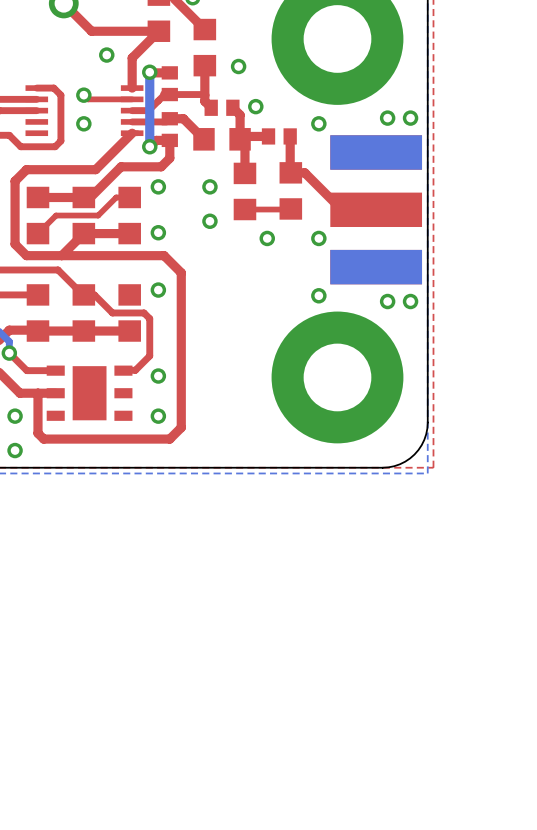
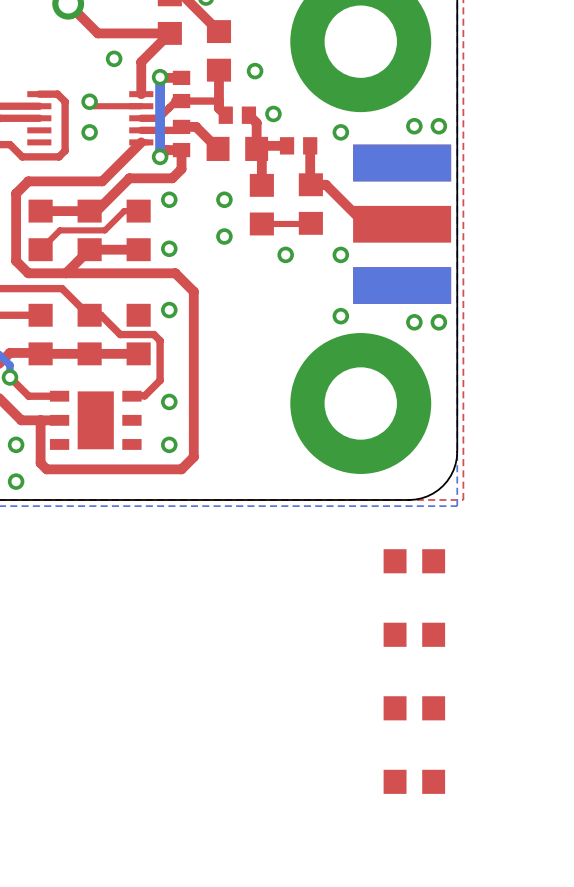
part: none -> (414, 561)
part: none -> (414, 634)
part: none -> (414, 708)
part: none -> (414, 781)

